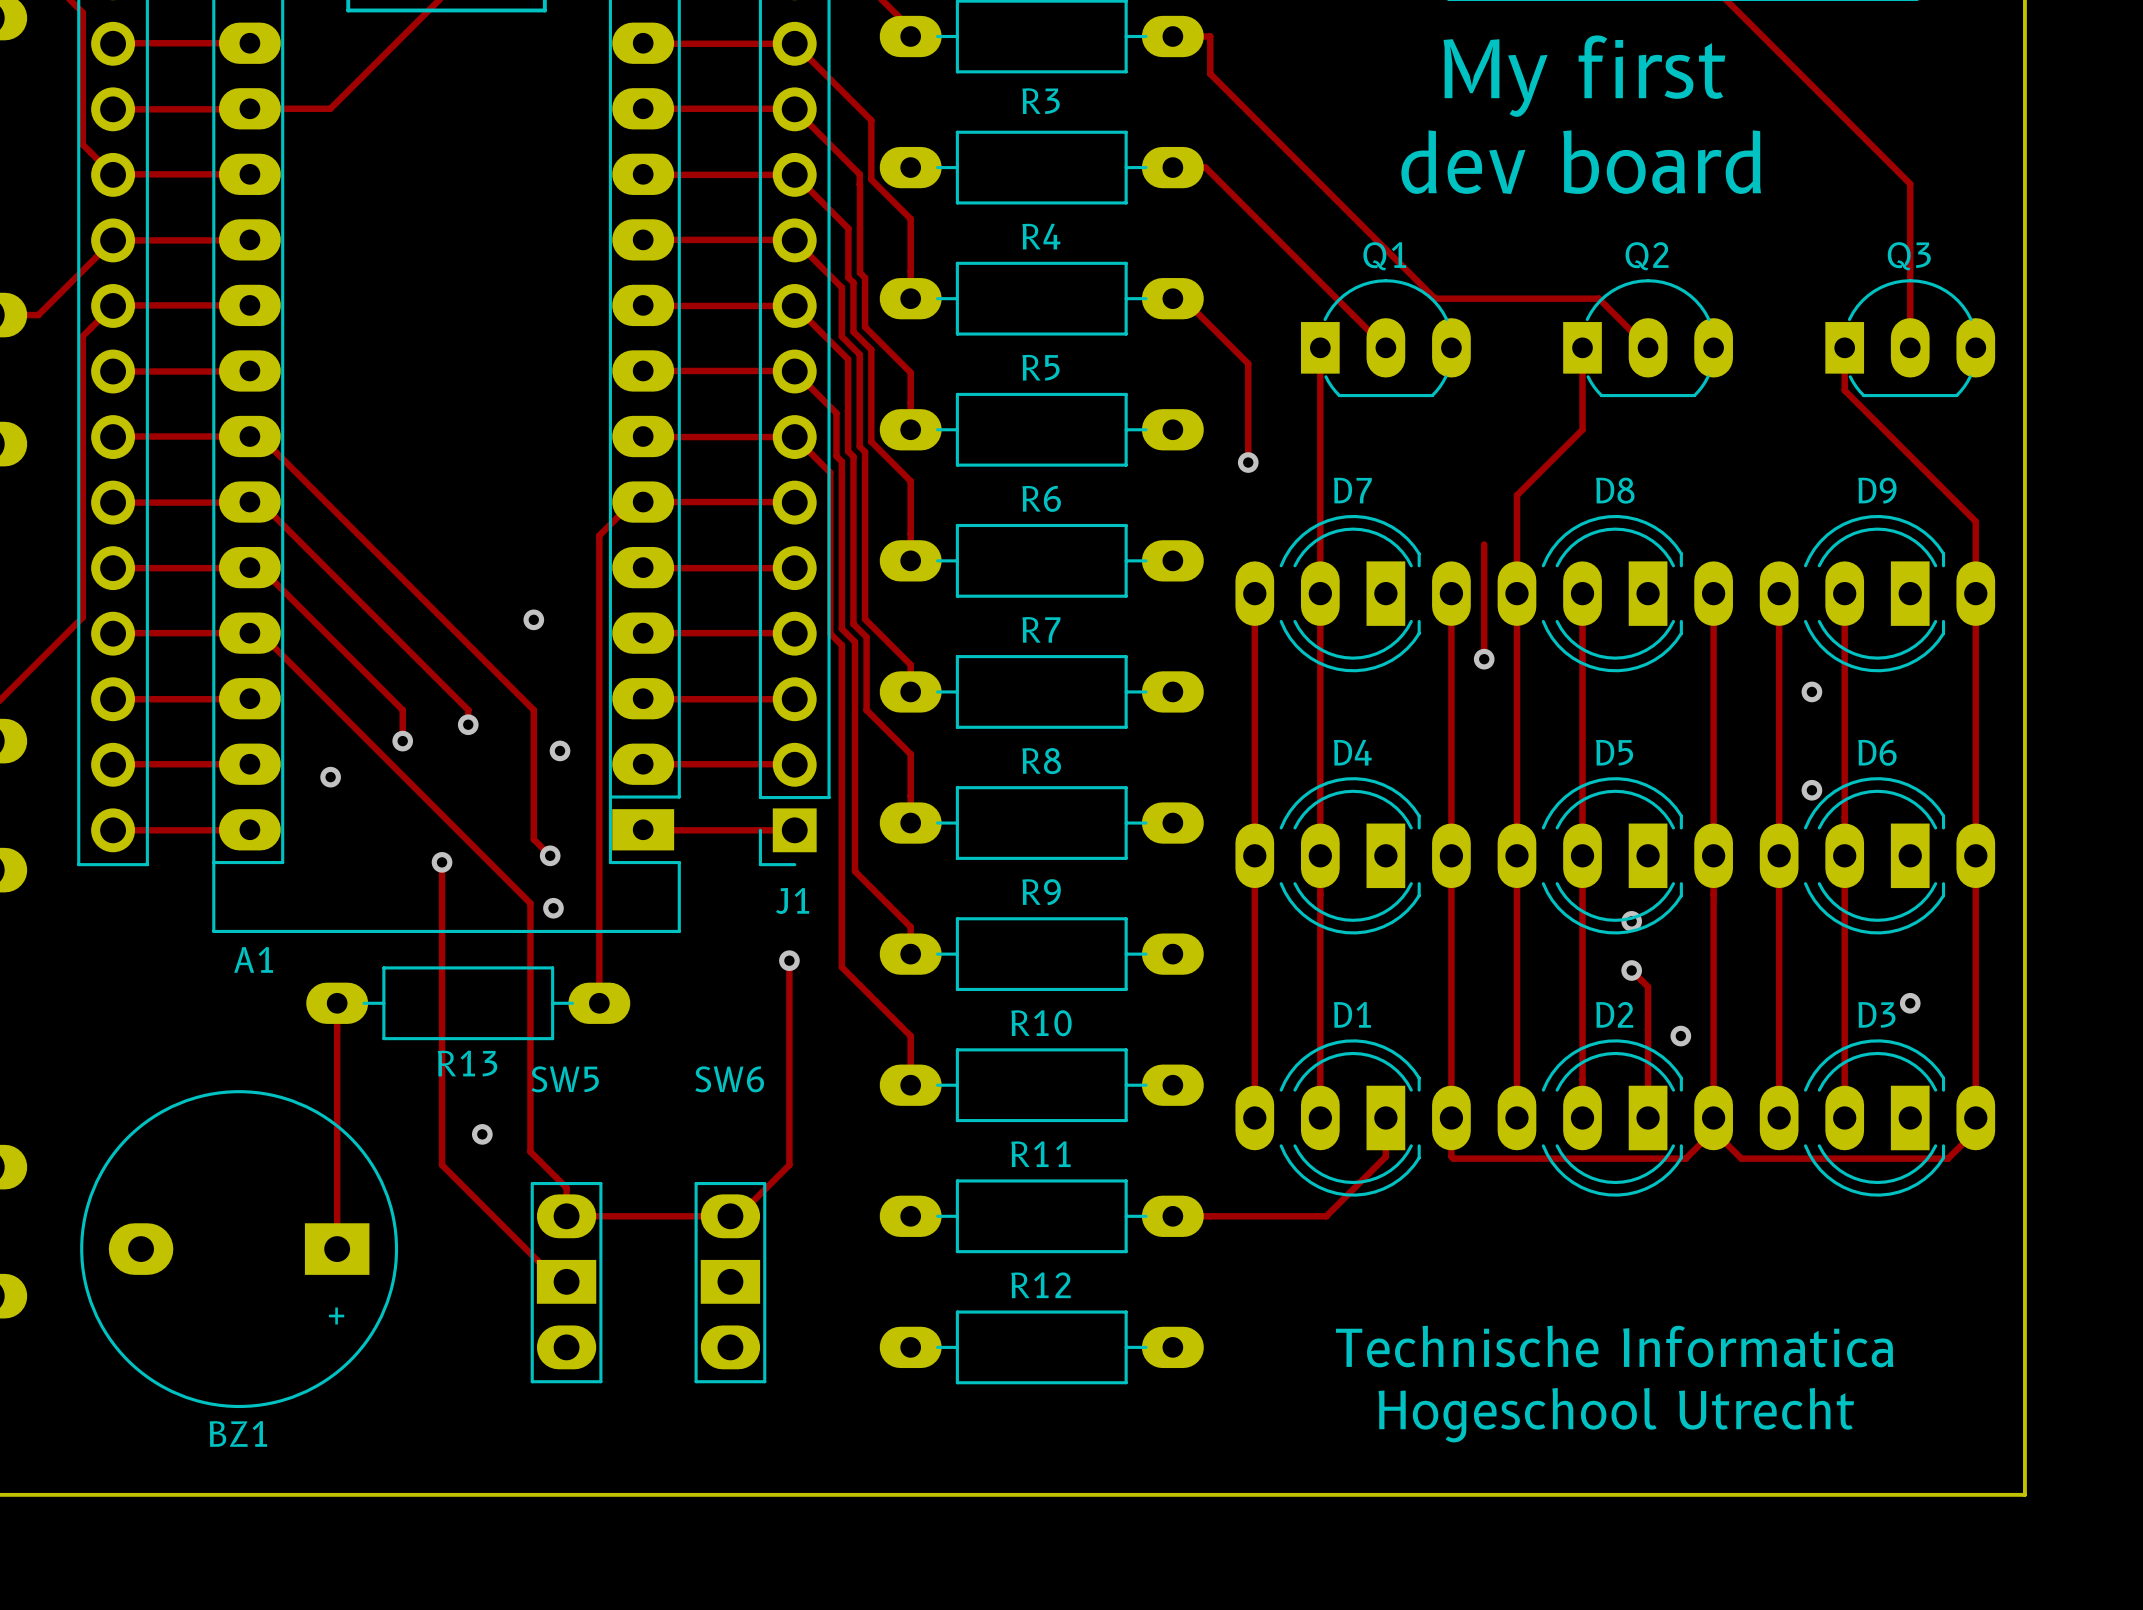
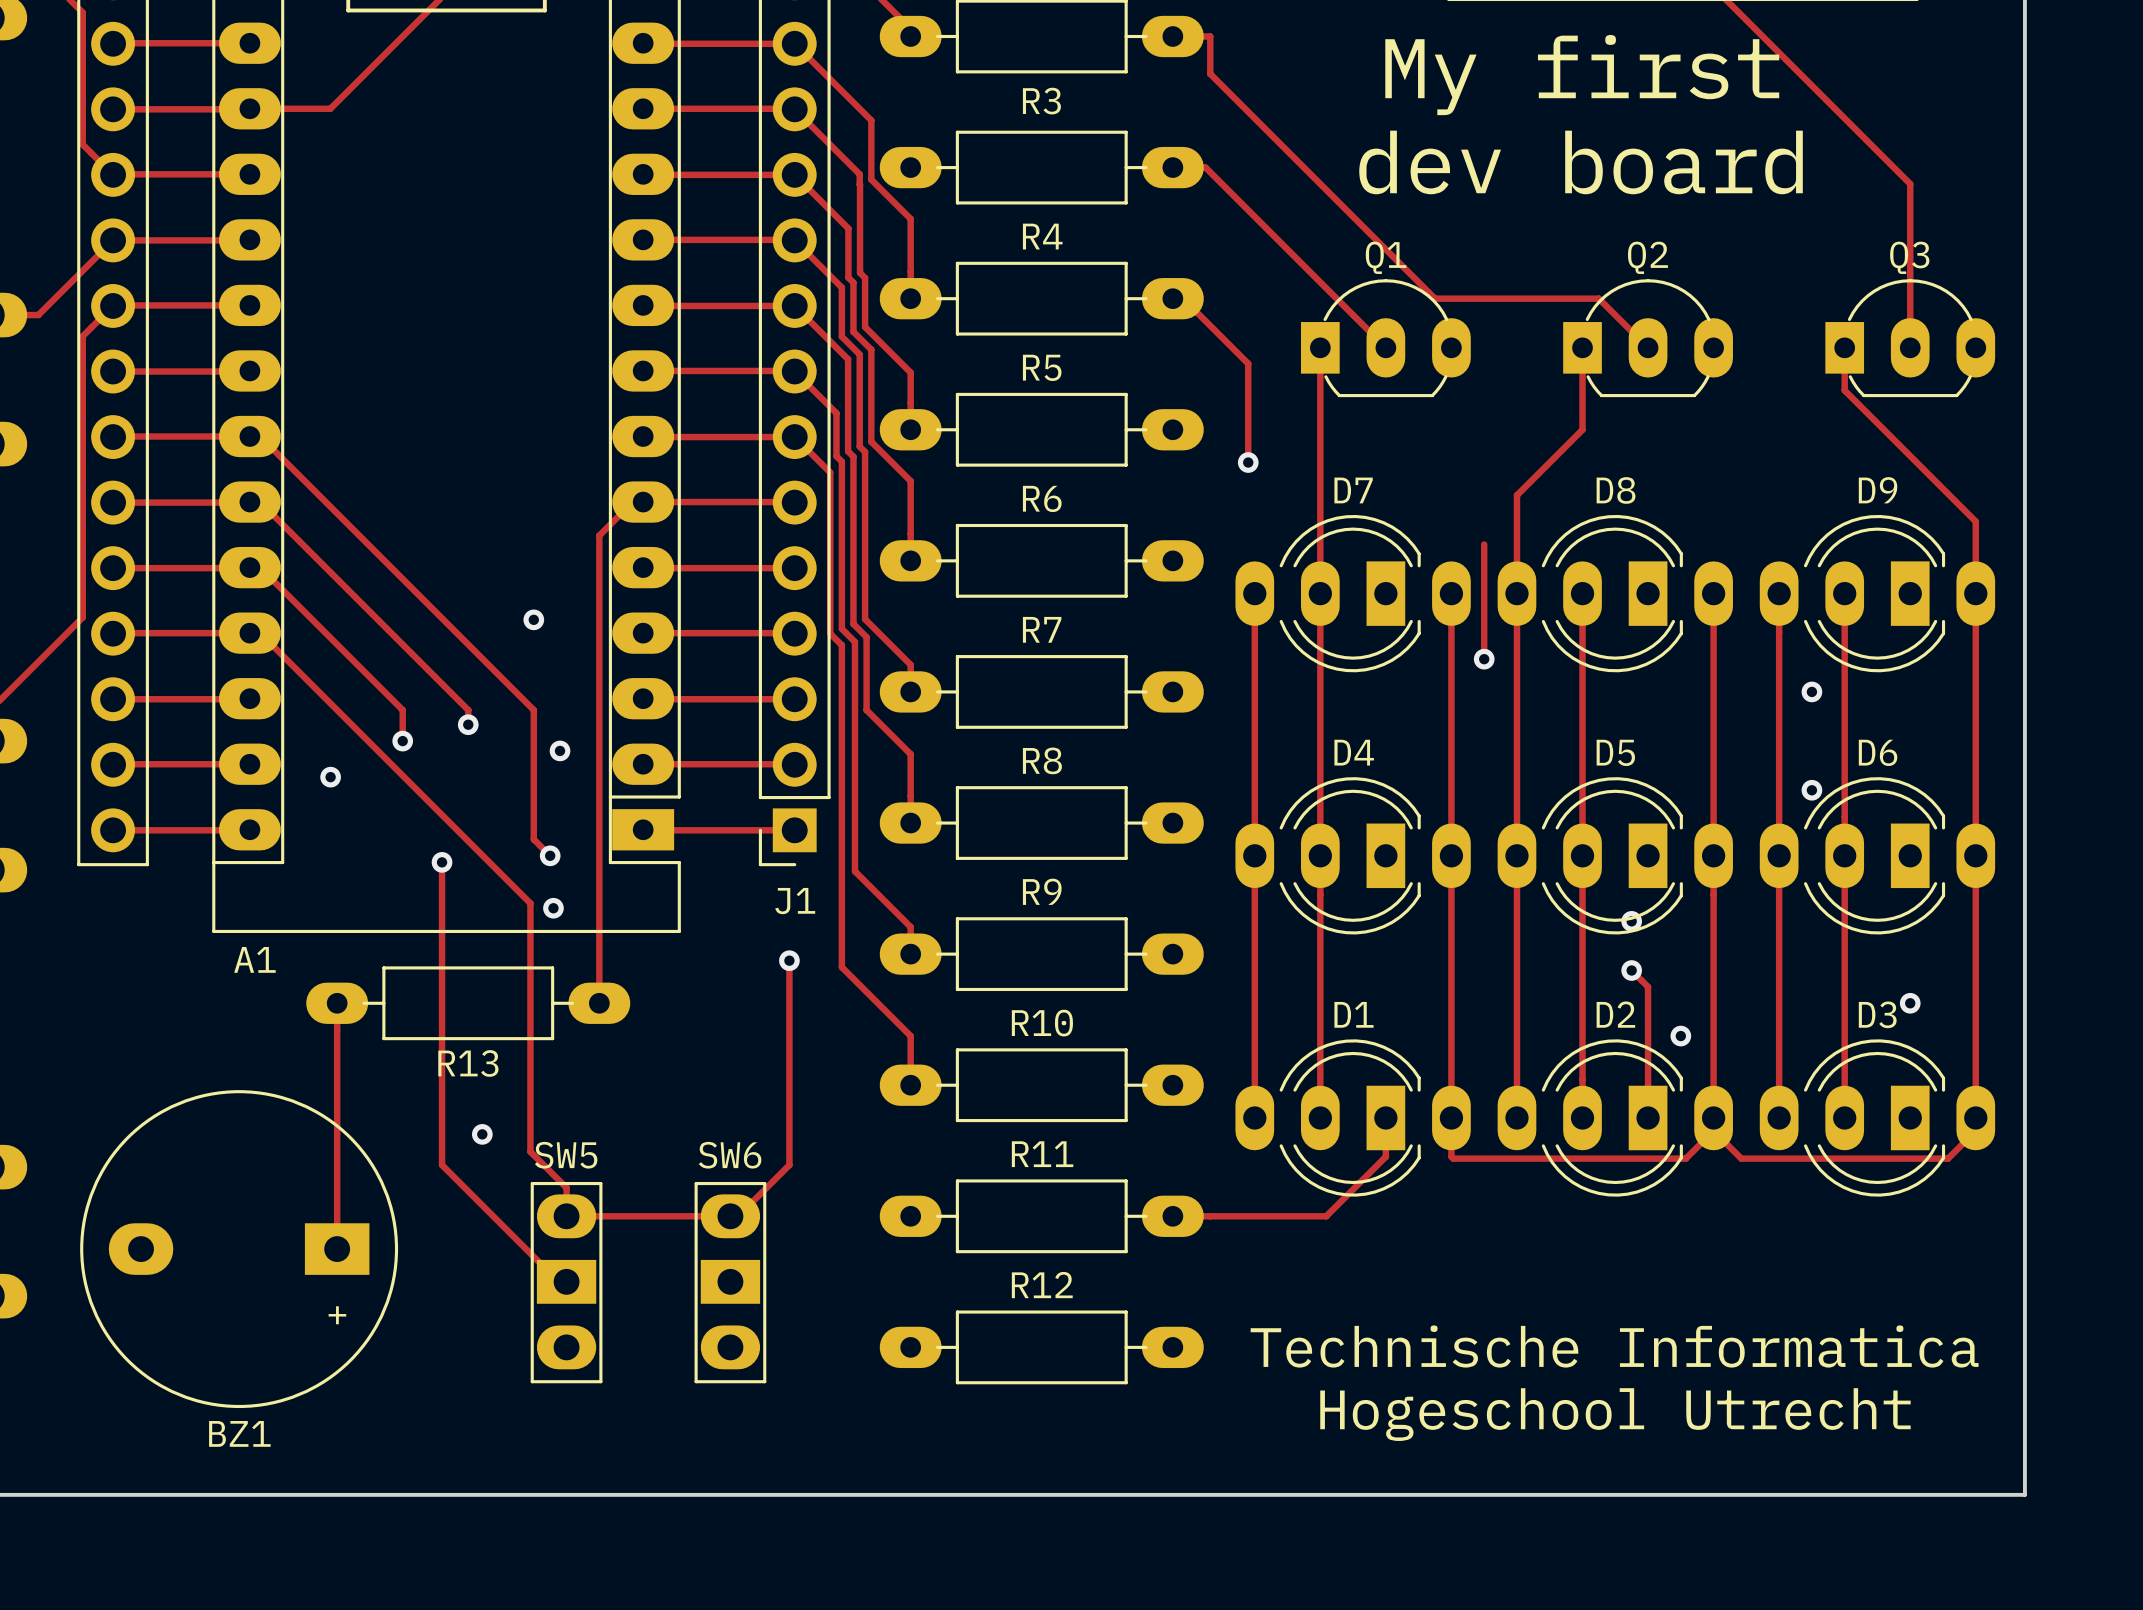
SW5 name position: SW5 (565, 1079) -> SW5 (566, 1155)
SW6 name position: SW6 (729, 1079) -> SW6 (730, 1155)

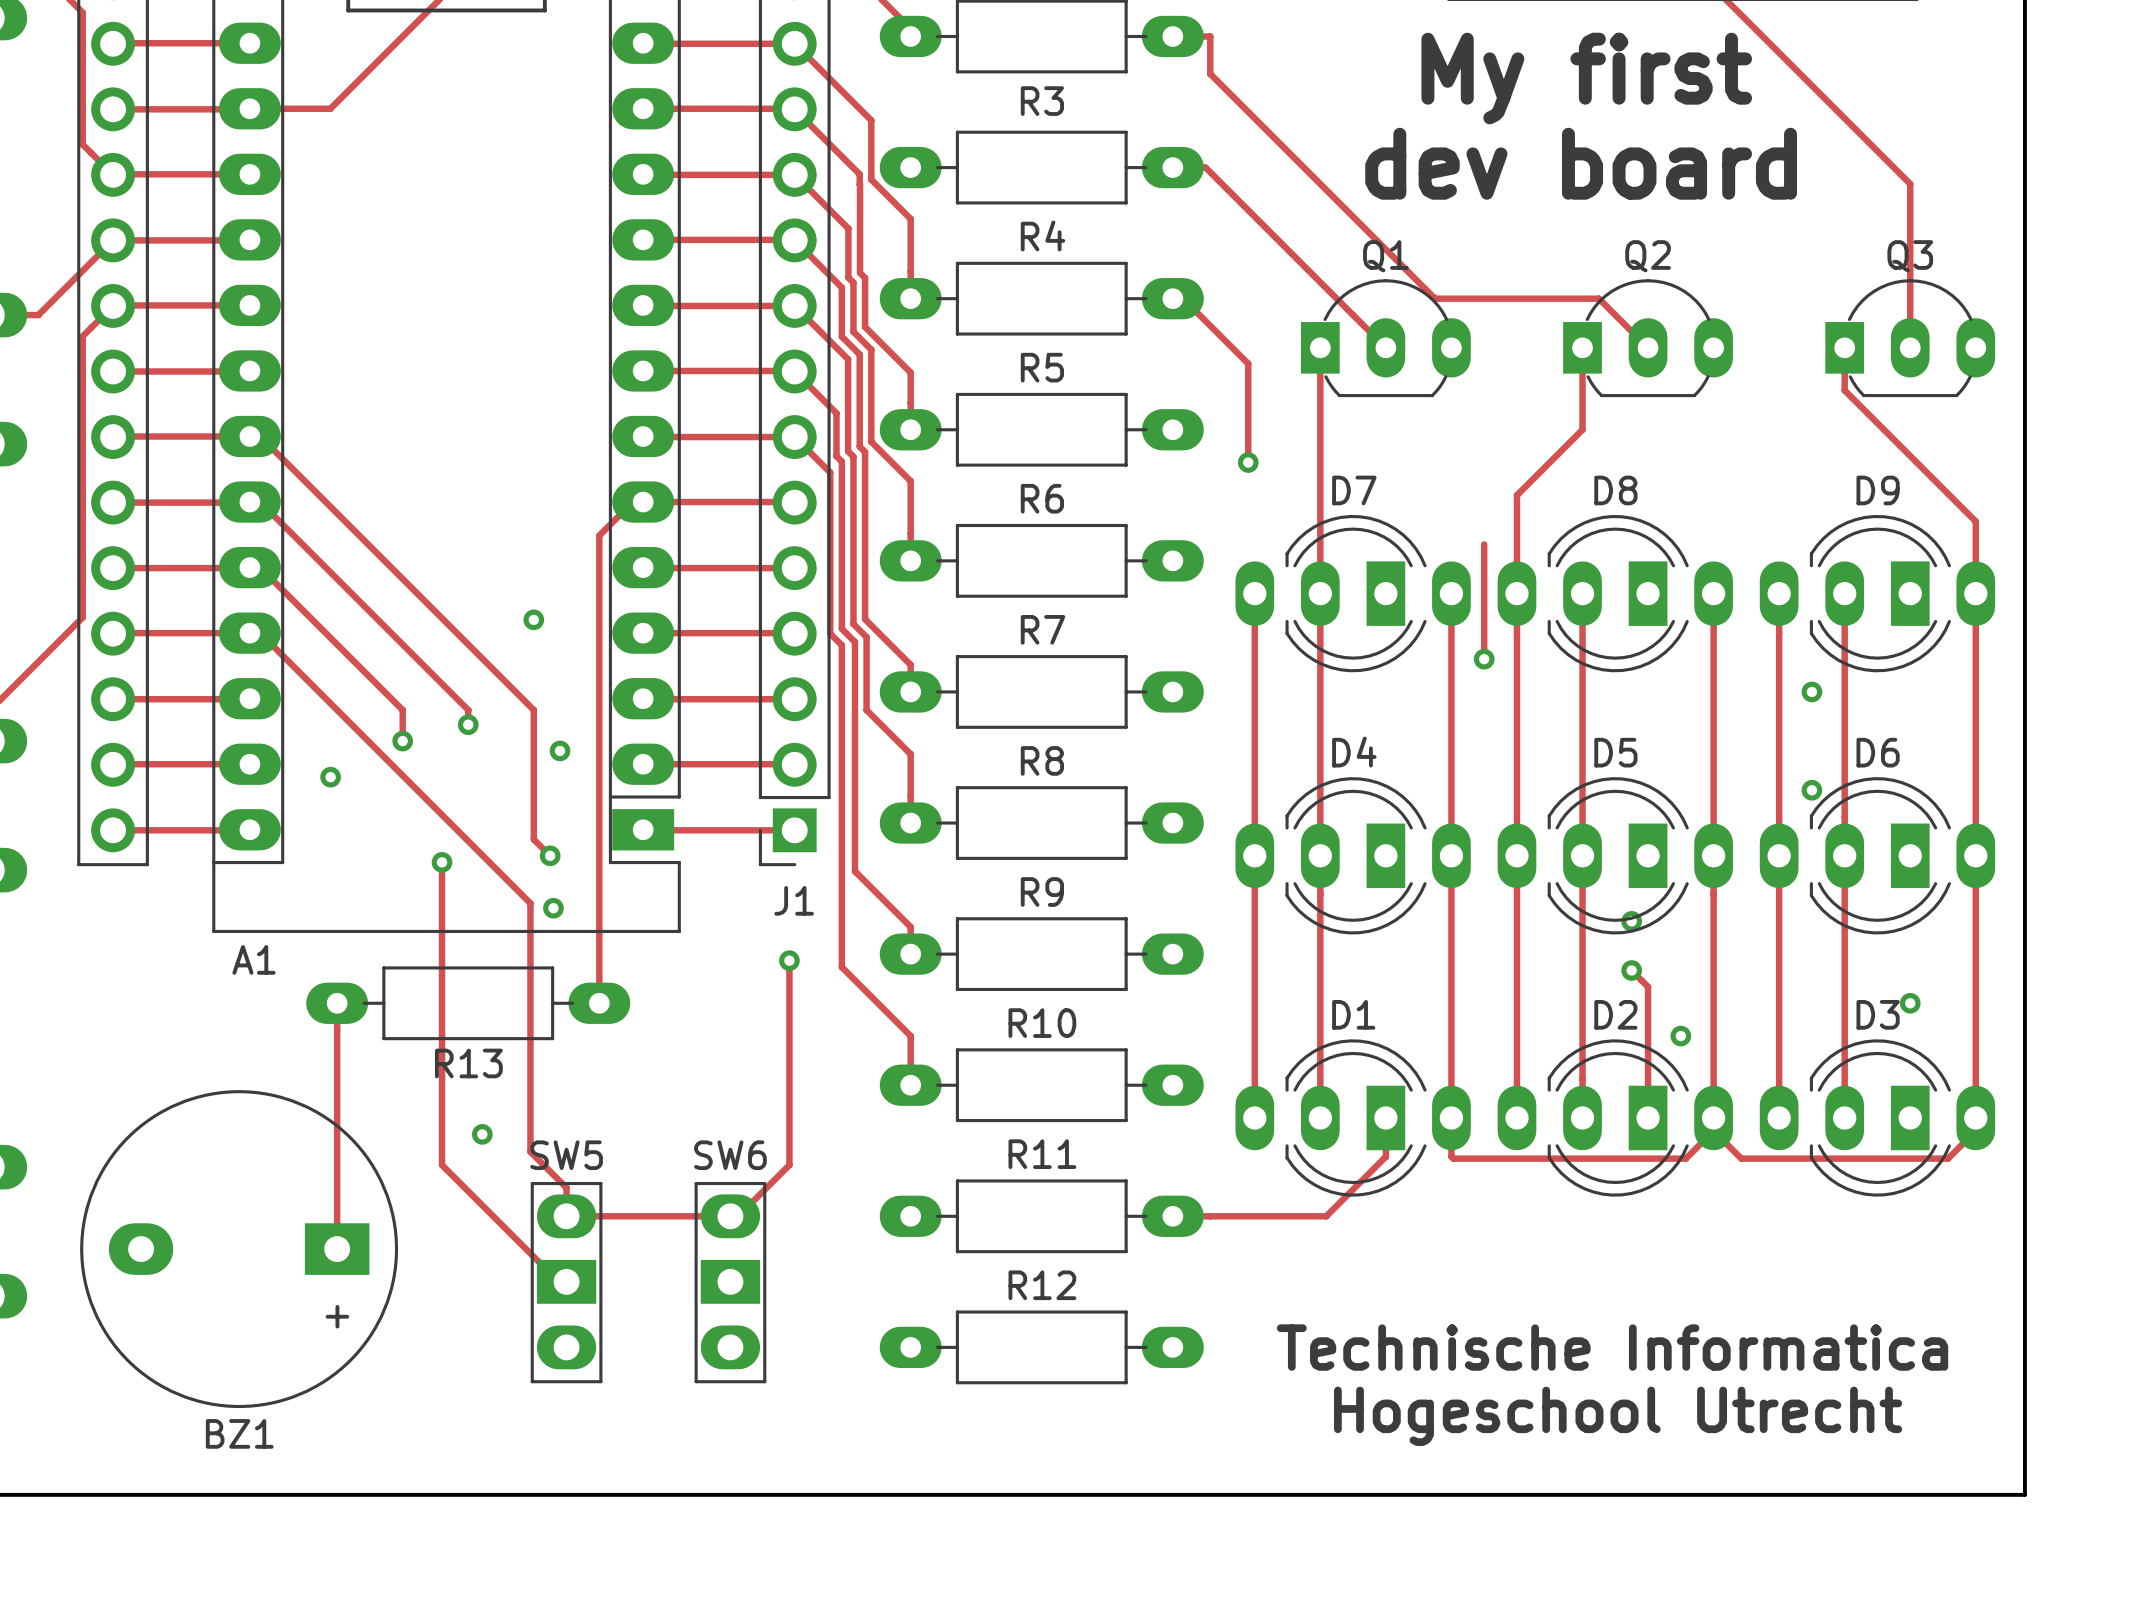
D7 footprint: [1235, 514, 1471, 673] -> [1235, 514, 1471, 673]
D8 footprint: [1497, 514, 1733, 673] -> [1497, 514, 1733, 673]
D9 footprint: [1759, 514, 1996, 673] -> [1759, 514, 1996, 673]
D4 footprint: [1235, 777, 1471, 935] -> [1235, 777, 1471, 935]
D5 footprint: [1497, 777, 1733, 935] -> [1497, 777, 1733, 935]
D6 footprint: [1759, 777, 1996, 935] -> [1759, 777, 1996, 935]
D1 footprint: [1235, 1039, 1471, 1197] -> [1235, 1039, 1471, 1197]
D2 footprint: [1497, 1039, 1733, 1197] -> [1497, 1039, 1733, 1197]
D3 footprint: [1759, 1039, 1996, 1197] -> [1759, 1039, 1996, 1197]

